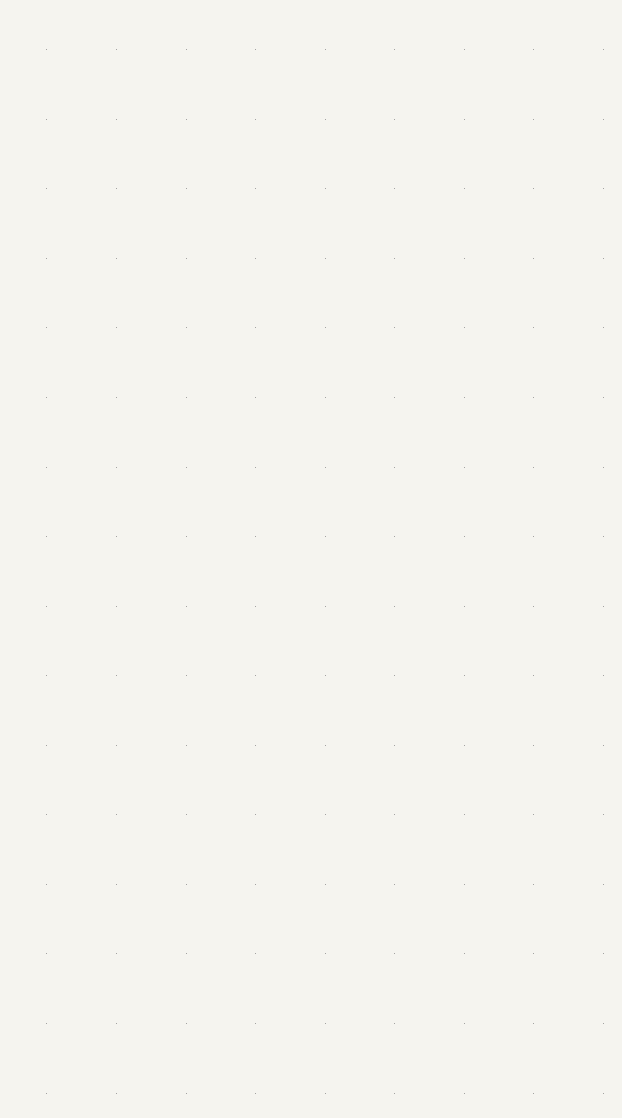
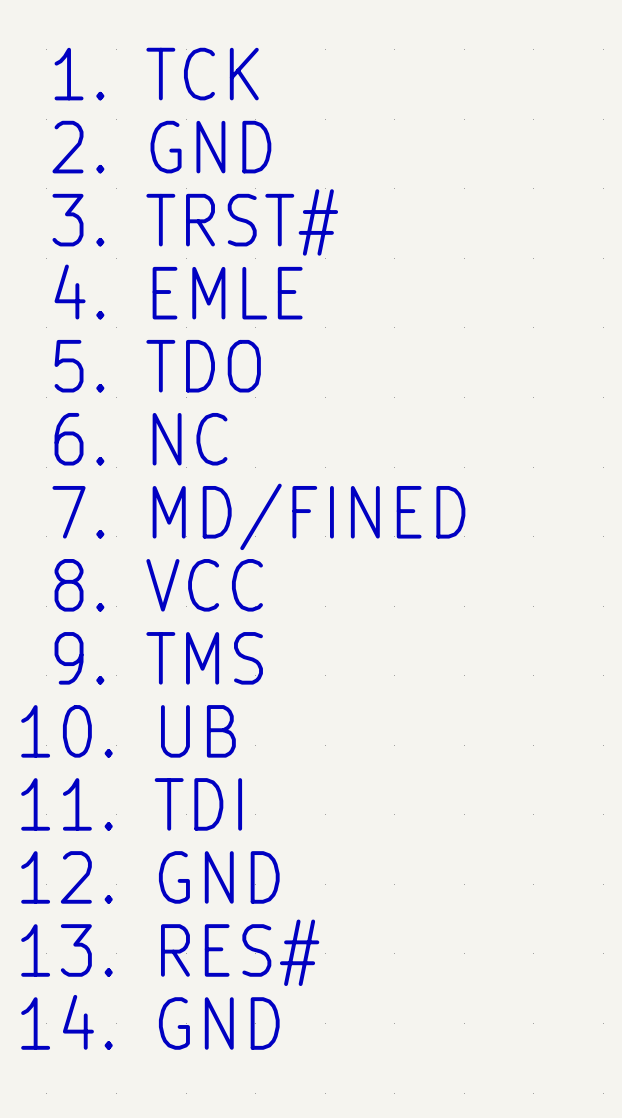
text: none -> 1. TCK (156, 74)
text: none -> 2. GND (161, 147)
text: none -> 3. TRST# (195, 222)
text: none -> 4. EMLE (178, 292)
text: none -> 5. TDO (157, 366)
text: none -> 6. NC (141, 439)
text: none -> 7. MD/FINED (258, 516)
text: none -> 8. VCC (158, 585)
text: none -> 9. TMS (158, 658)
text: none -> 10. UB (128, 731)
text: none -> 11. TDI (131, 804)
text: none -> 12. GND (150, 877)
text: none -> 13. RES# (170, 952)
text: none -> 14. GND (150, 1022)

